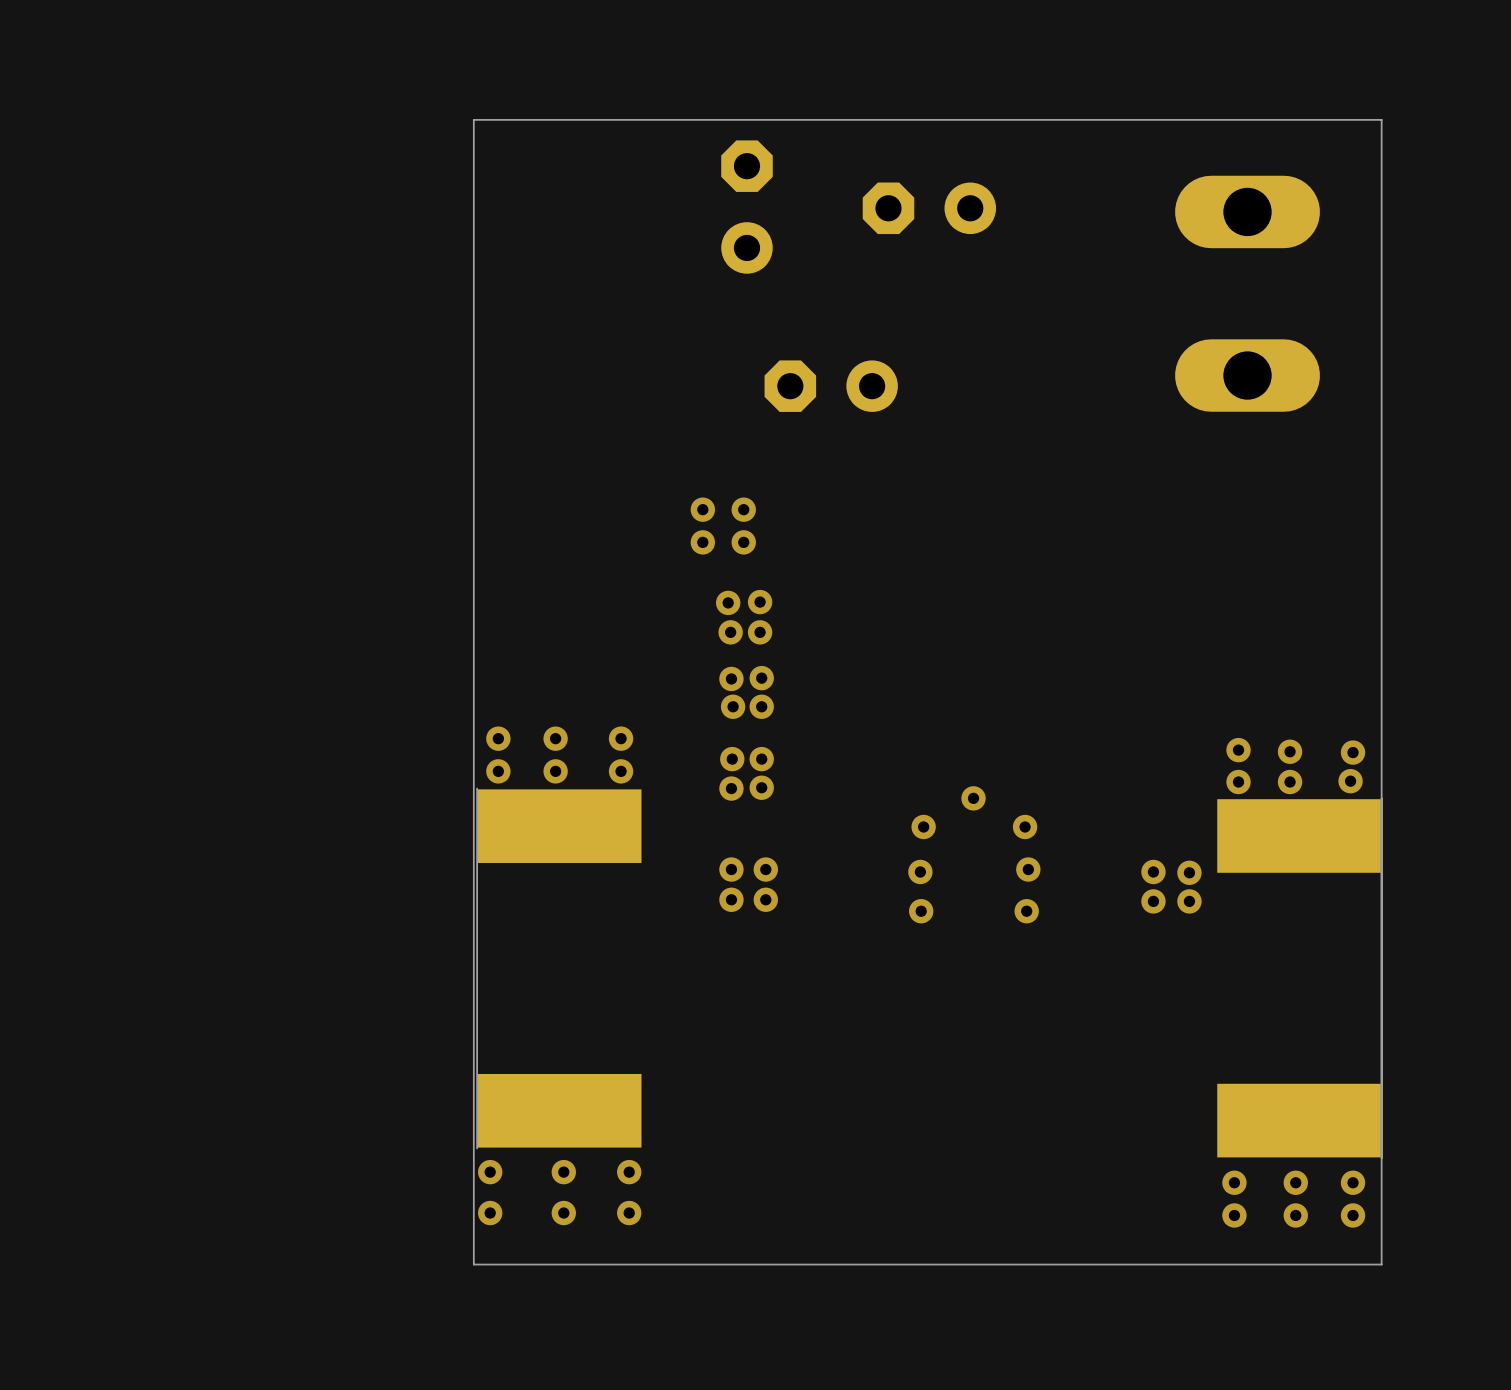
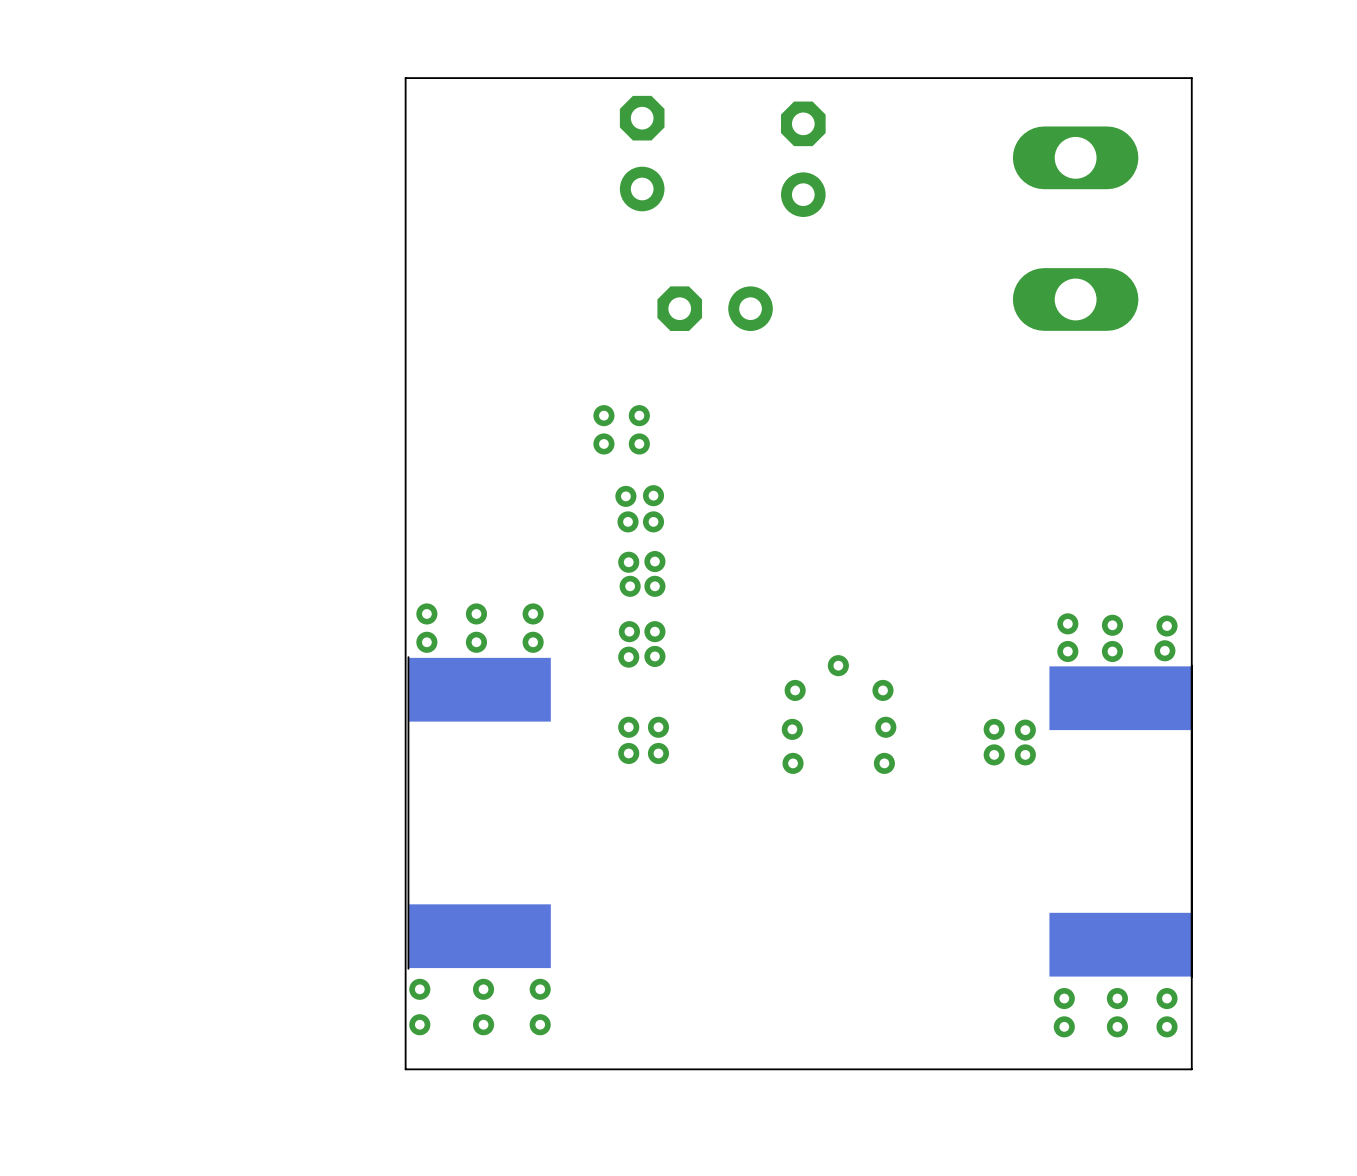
part rotation: 0° (929, 208) -> 90° clockwise (803, 159)

